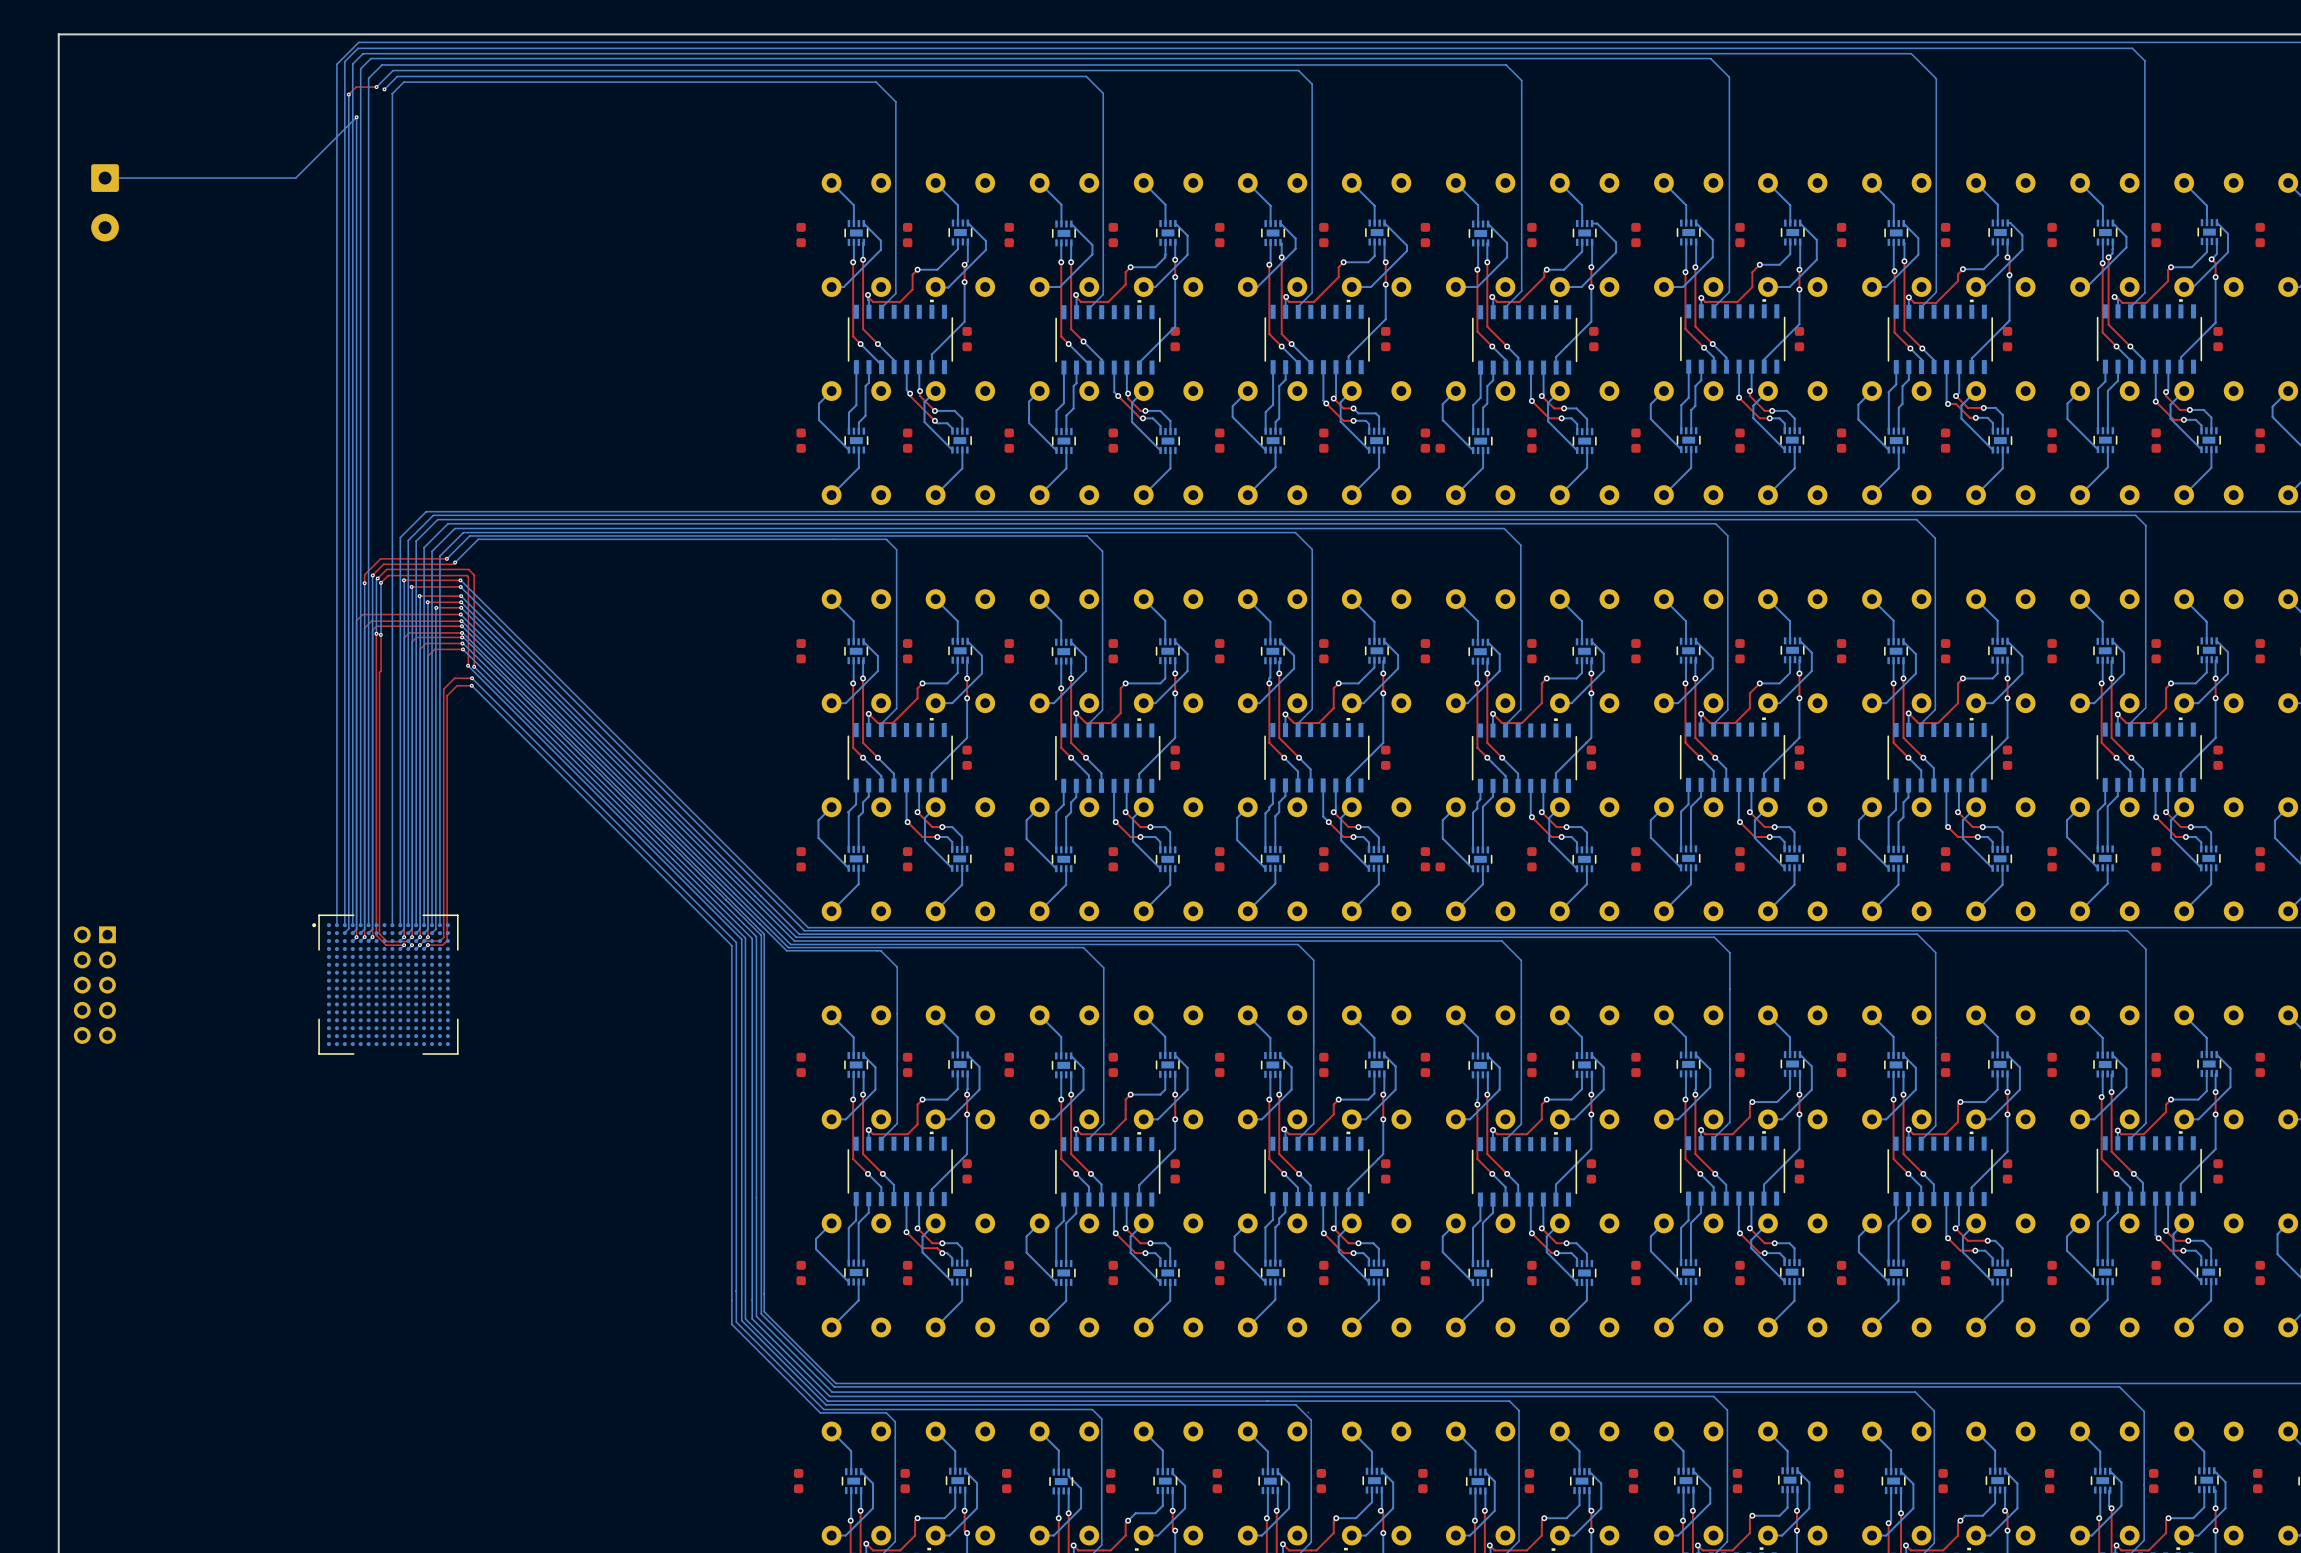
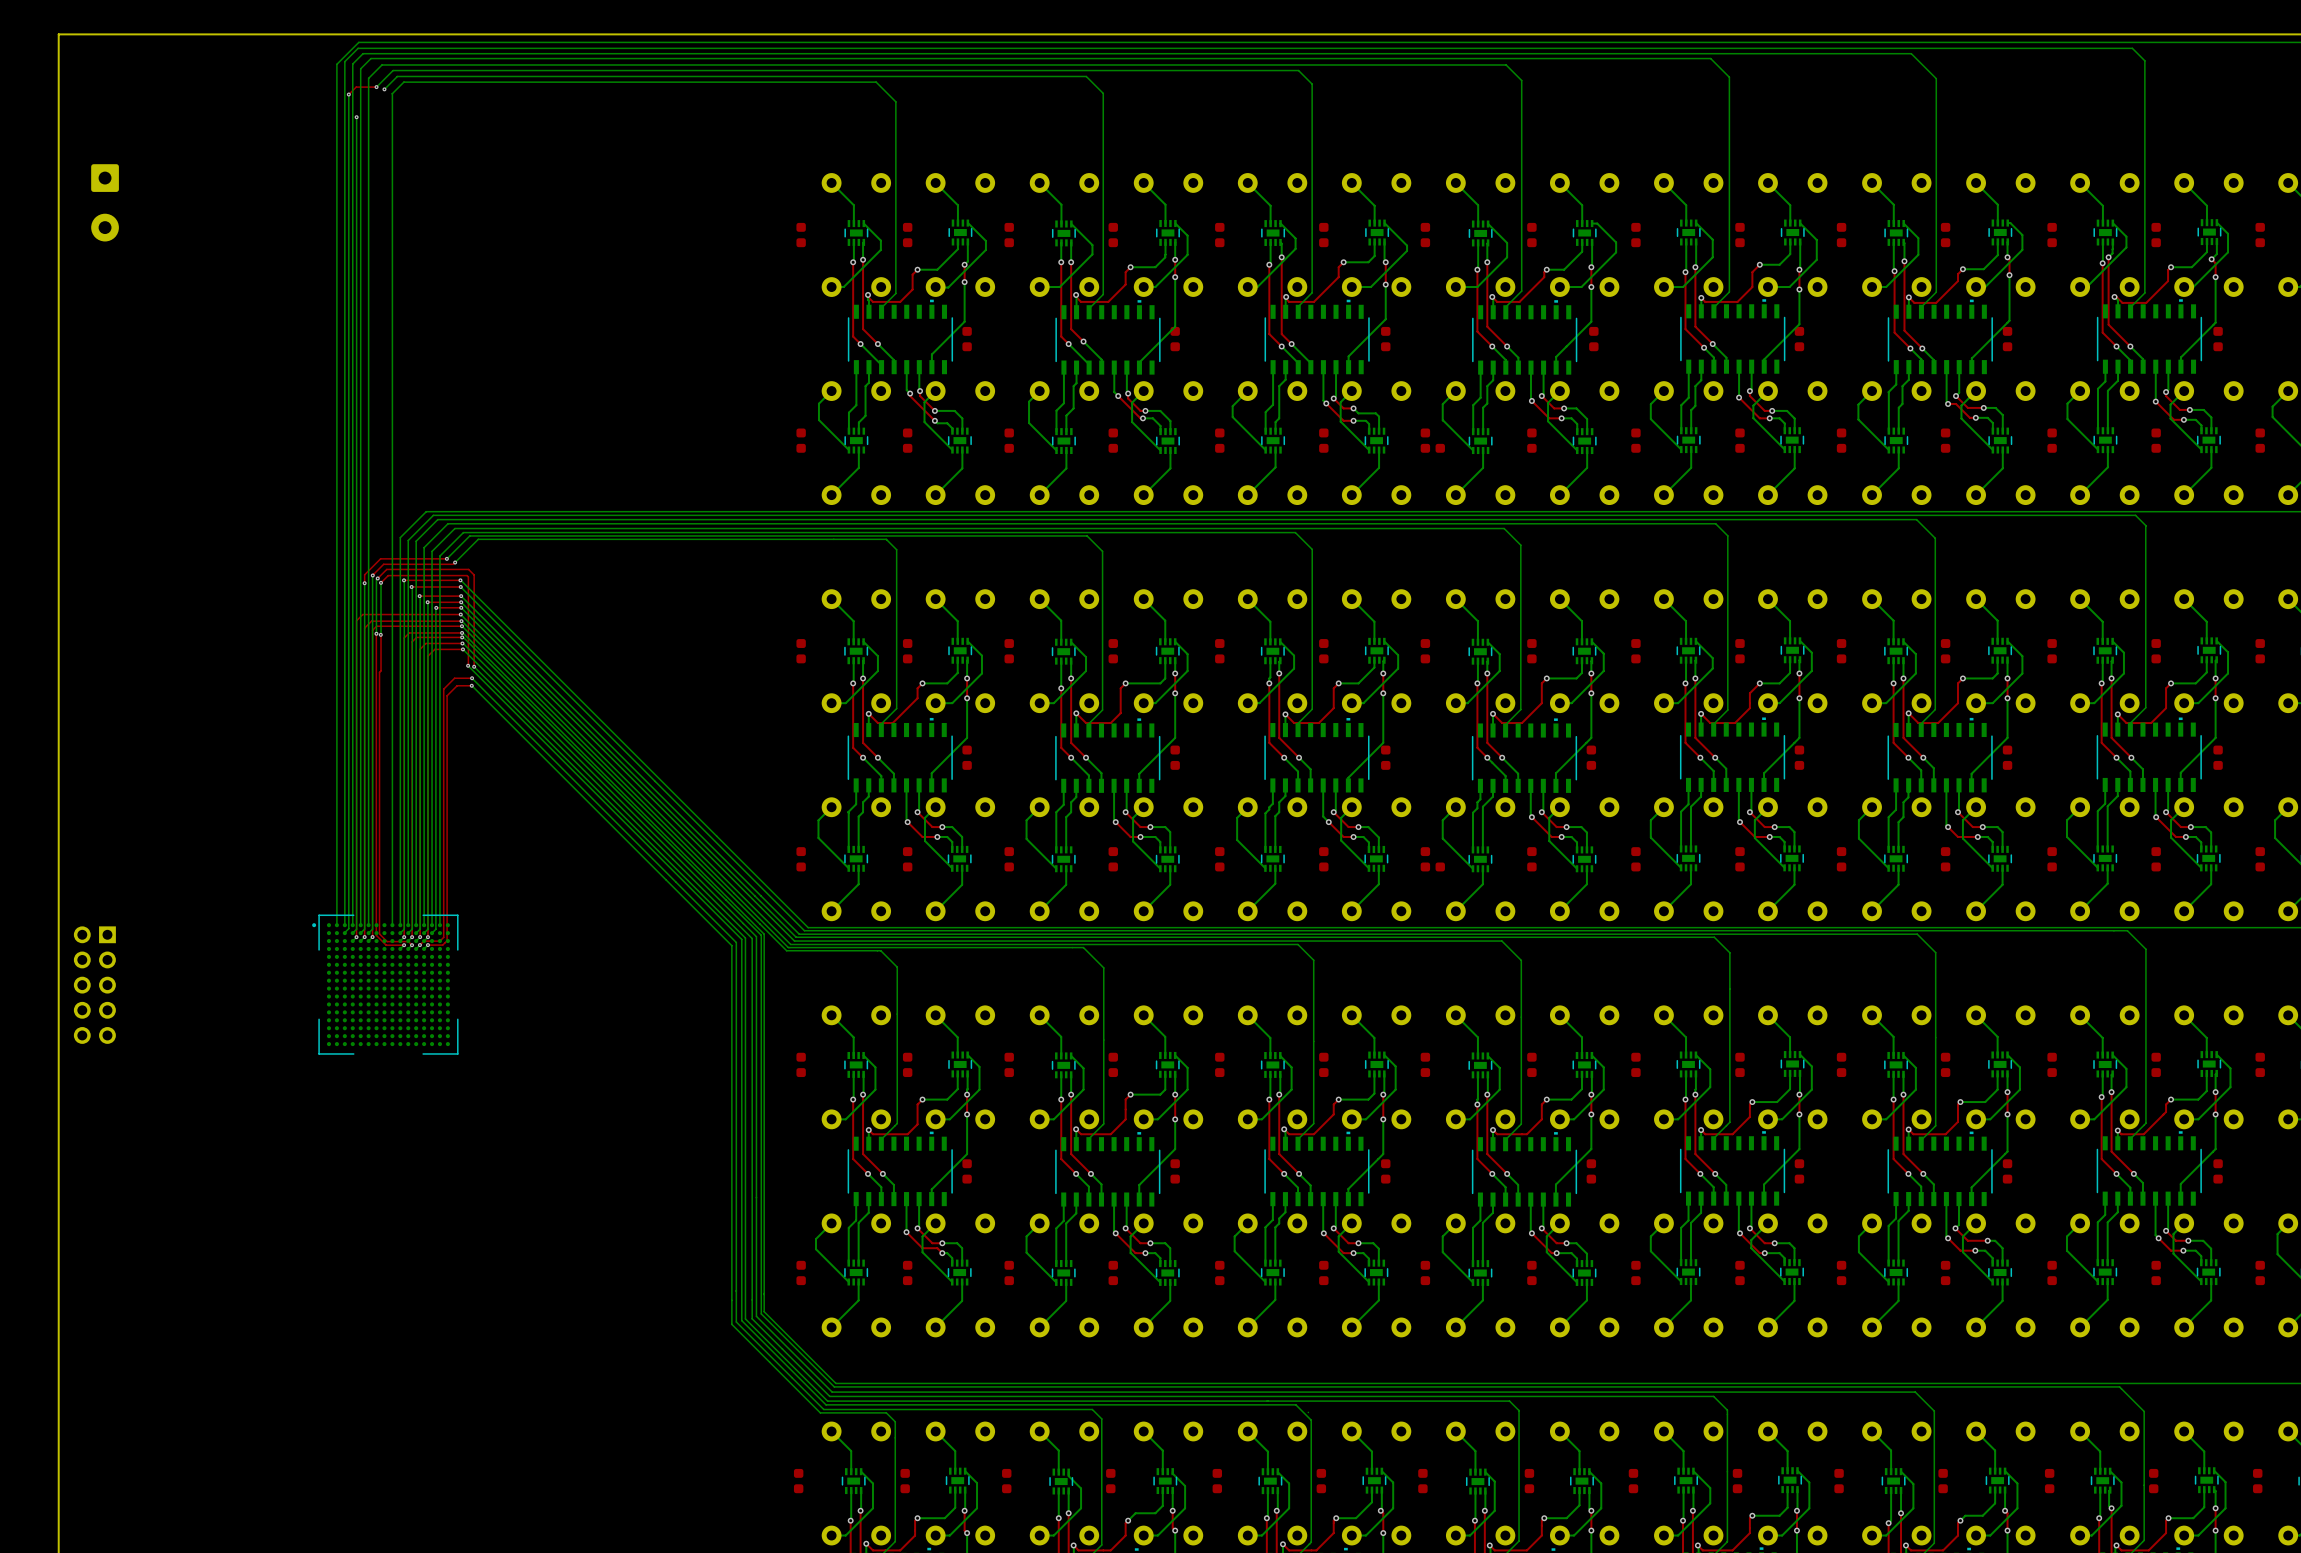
bottom track: (356, 117) (295, 178) (105, 178) -> none

